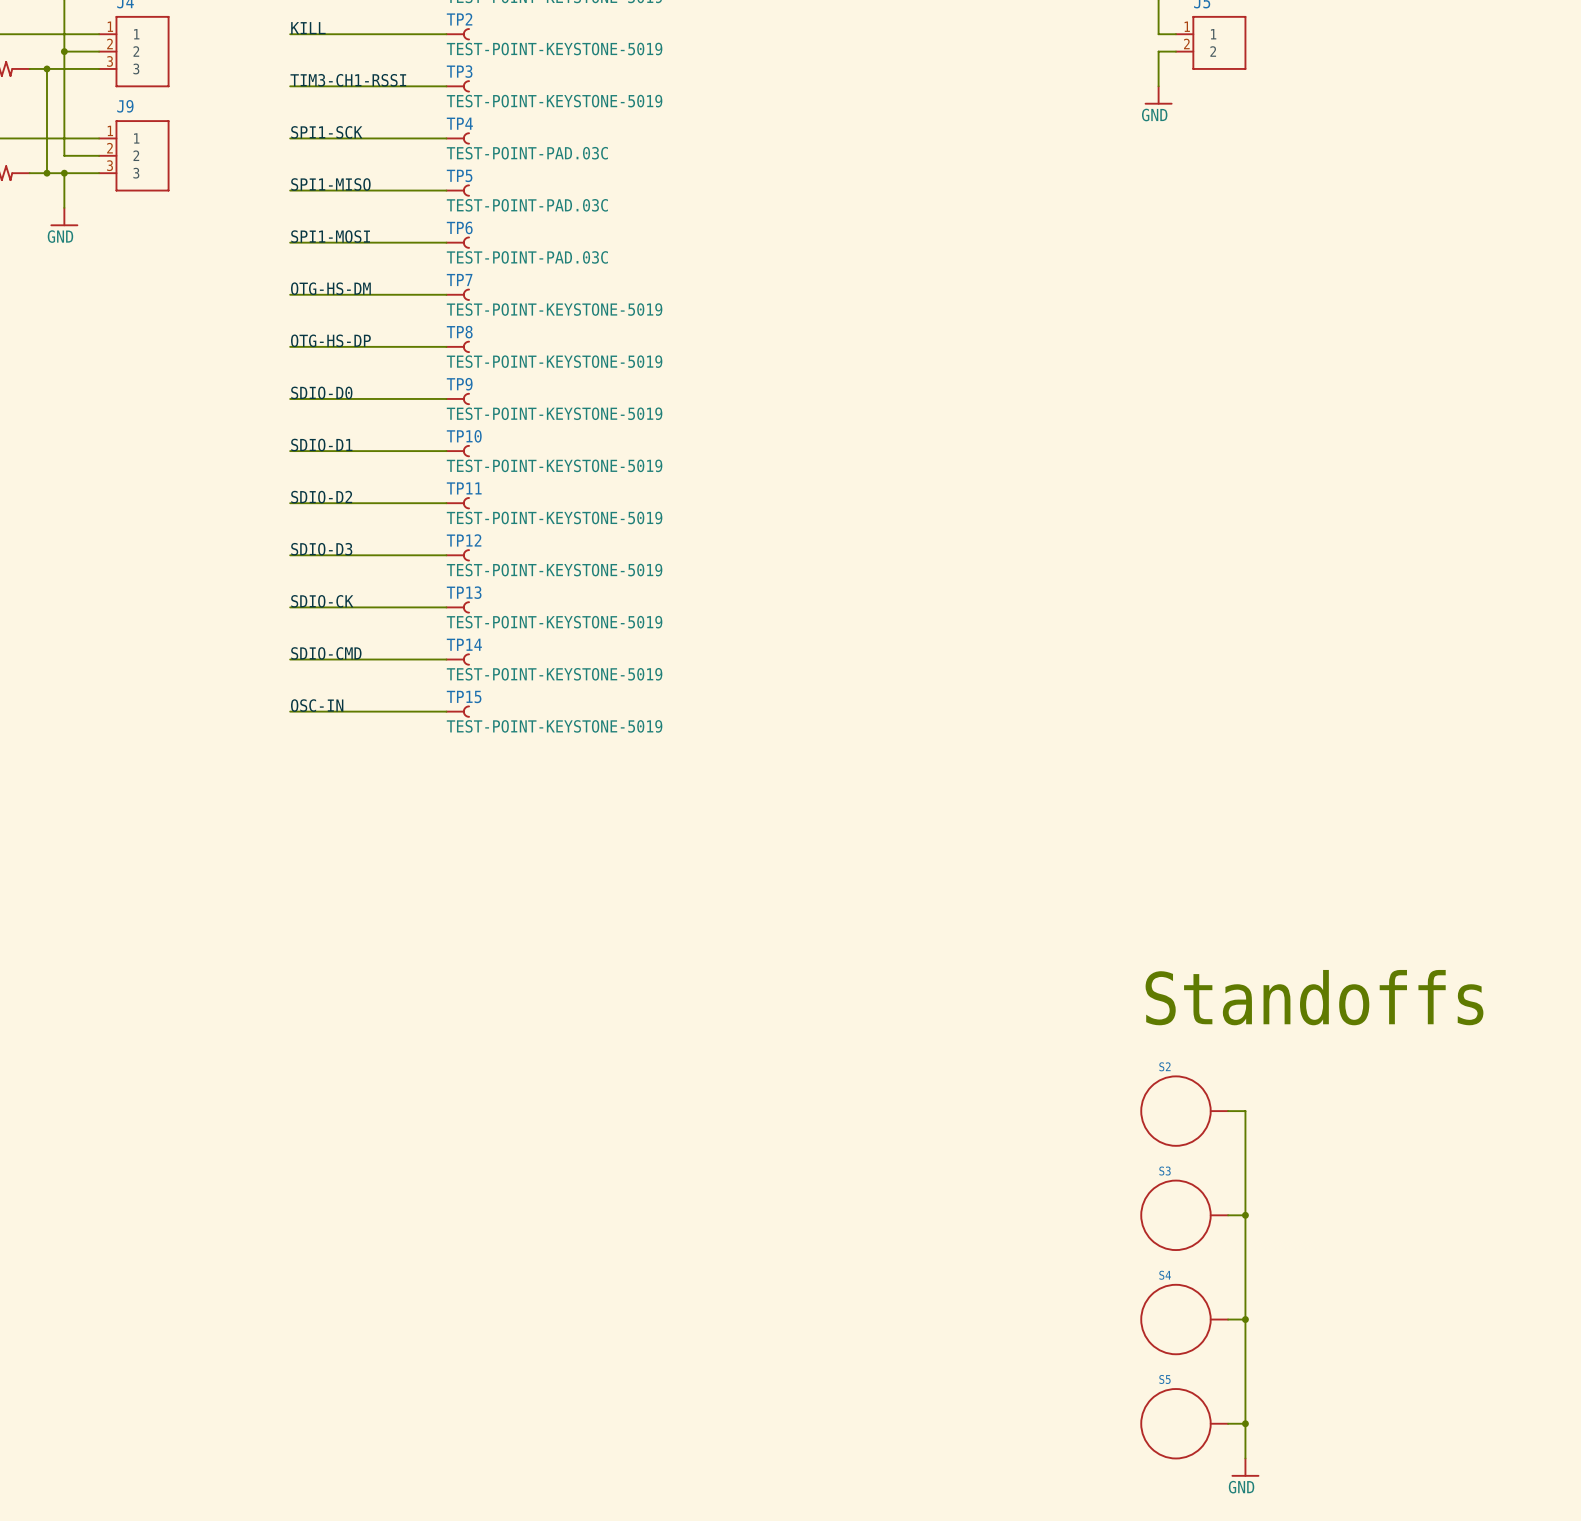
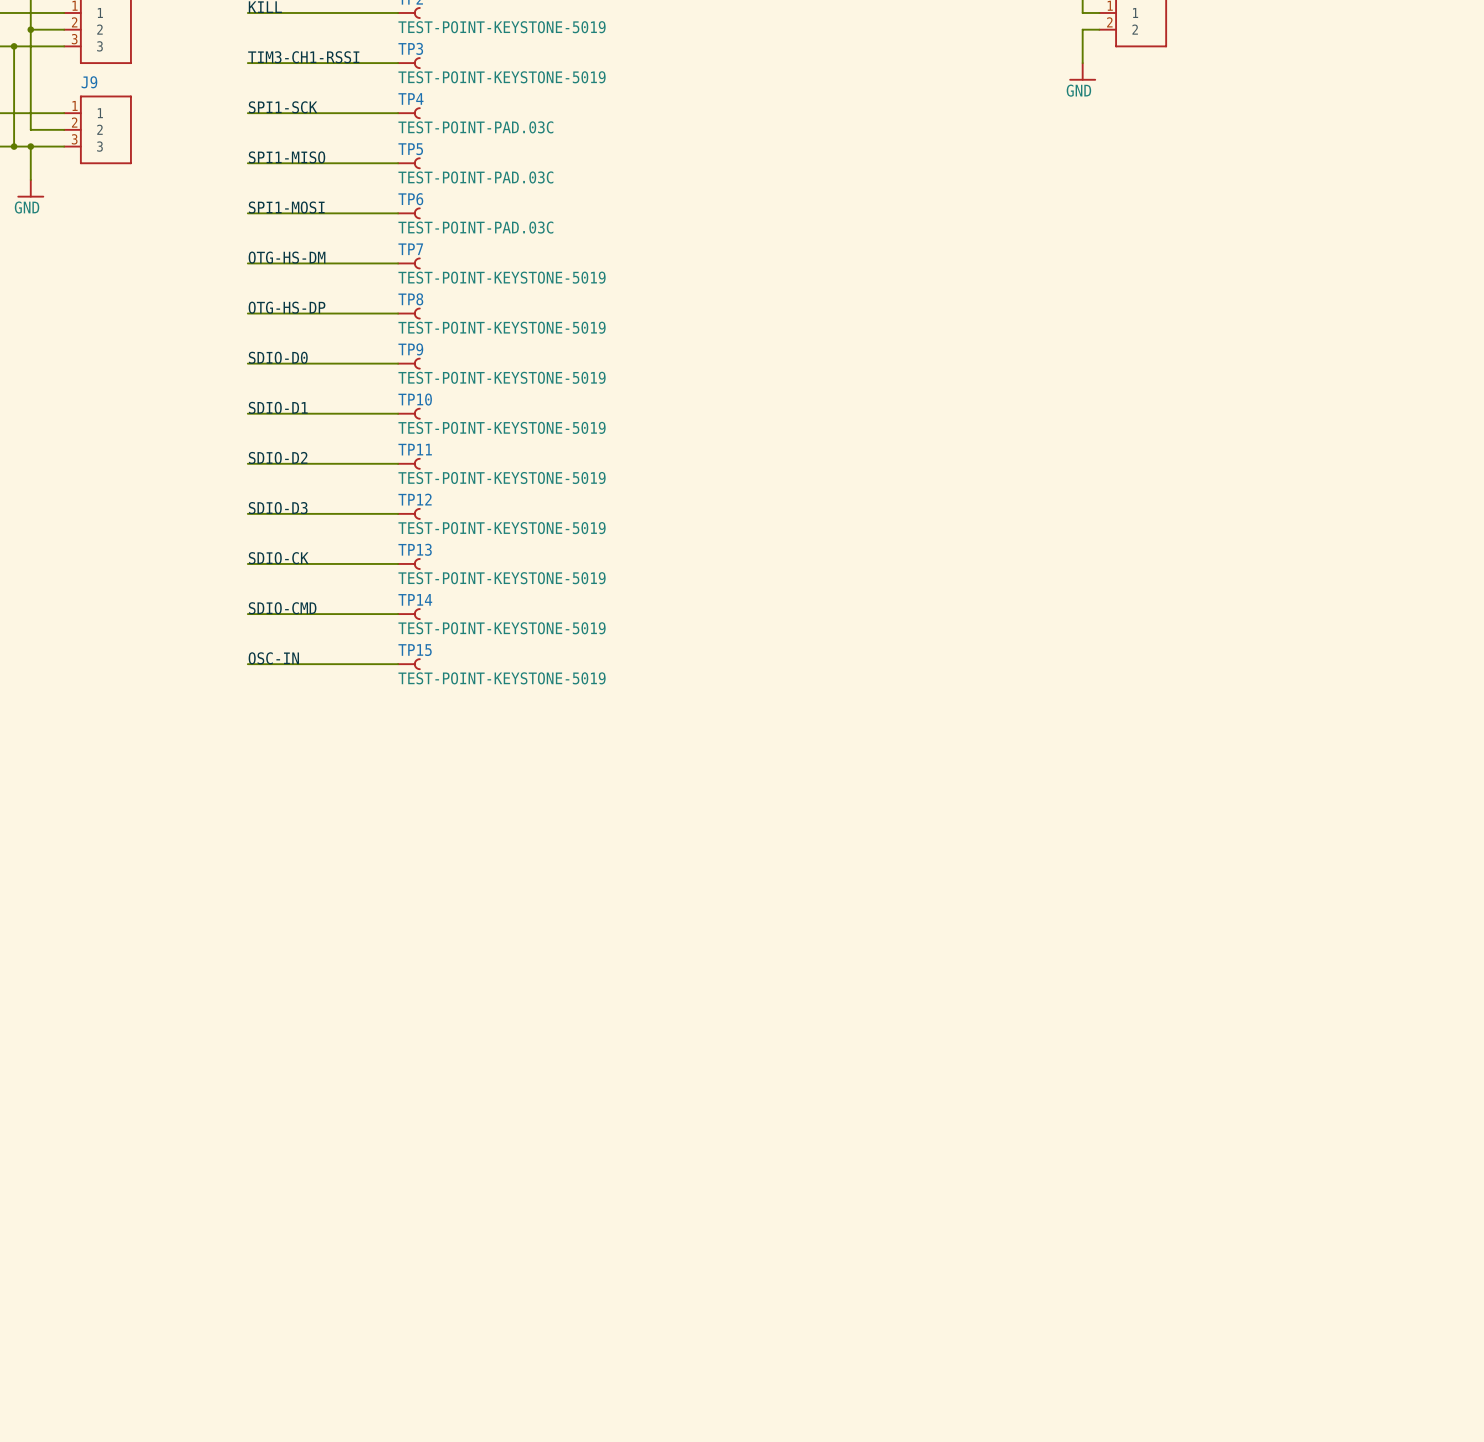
text: Standoffs (1314, 997) -> none
S2: (1184, 1111) -> none
wire: (1228, 1111) (1245, 1111) (1245, 1458) -> none
S3: (1184, 1215) -> none
wire: (1228, 1215) (1245, 1215) -> none
junction: (1245, 1215) -> none
S4: (1184, 1319) -> none
wire: (1228, 1319) (1245, 1319) -> none
junction: (1245, 1319) -> none
S5: (1184, 1423) -> none
wire: (1228, 1423) (1245, 1423) -> none
junction: (1245, 1423) -> none
power symbol: GND (1245, 1467) -> none

